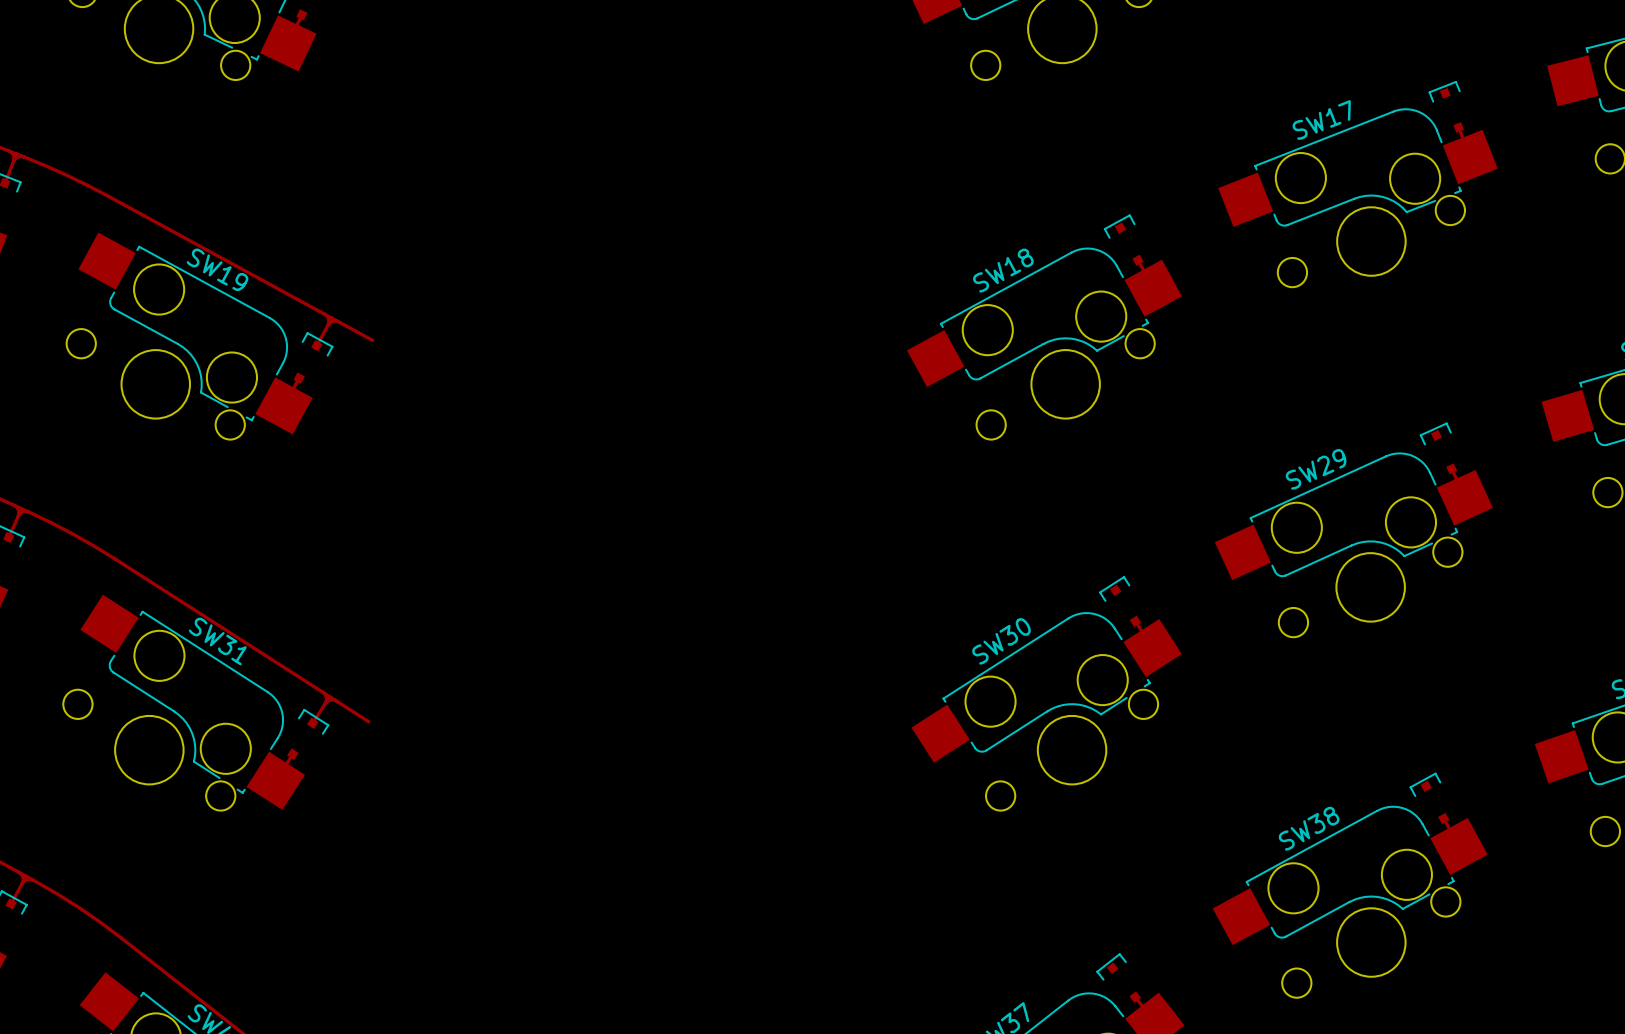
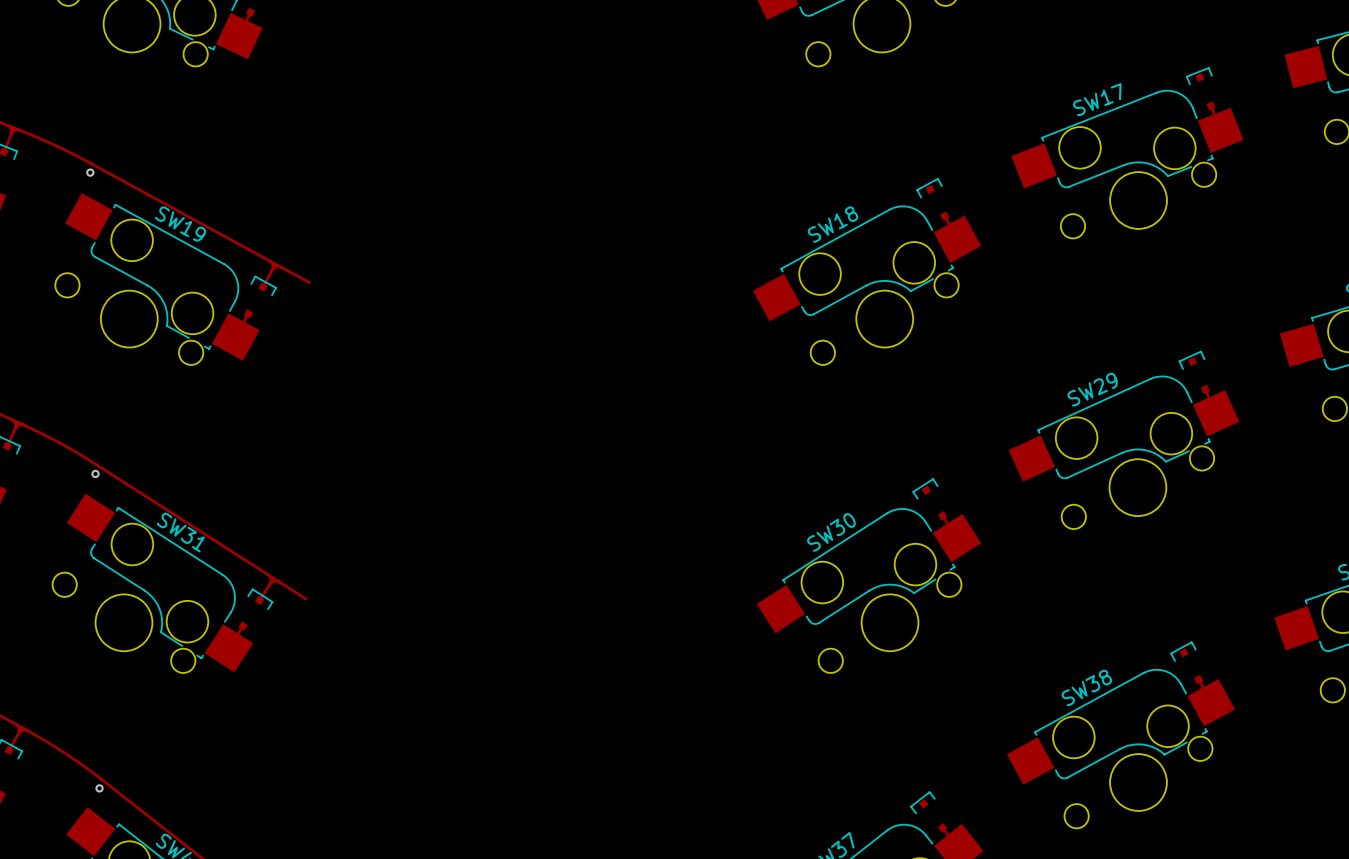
via: none -> (90, 172)
via: none -> (95, 473)
via: none -> (99, 788)

